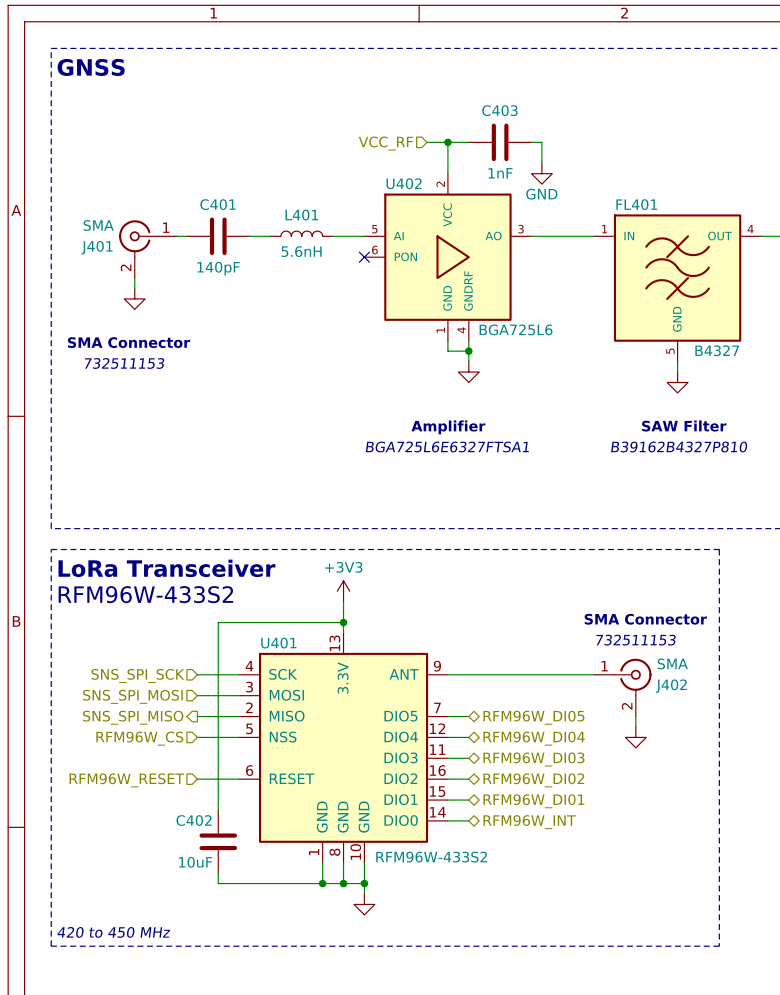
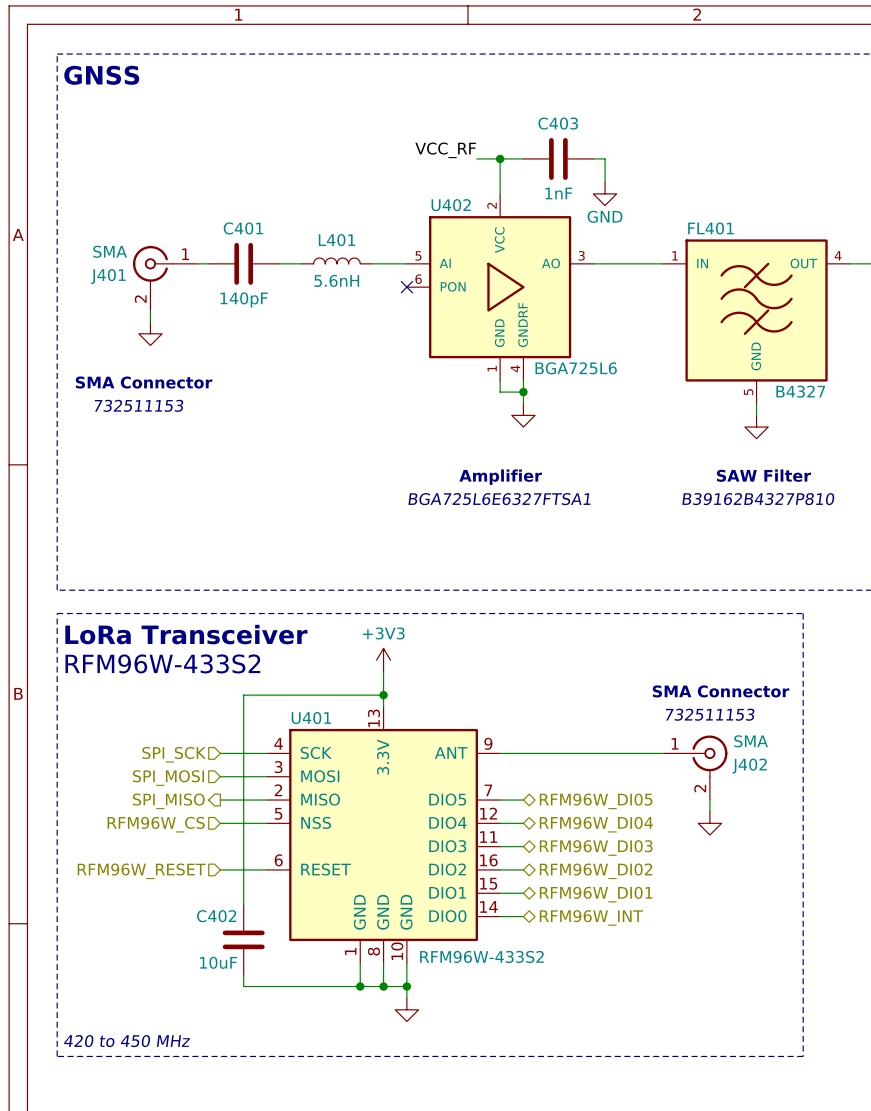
label: none -> VCC_RF (445, 150)
hierarchical label: VCC_RF (385, 143) -> none
hierarchical label: SNS_SPI_SCK (137, 675) -> SPI_SCK (174, 754)
hierarchical label: SNS_SPI_MOSI (132, 696) -> SPI_MOSI (168, 778)
hierarchical label: SNS_SPI_MISO (133, 717) -> SPI_MISO (168, 801)

